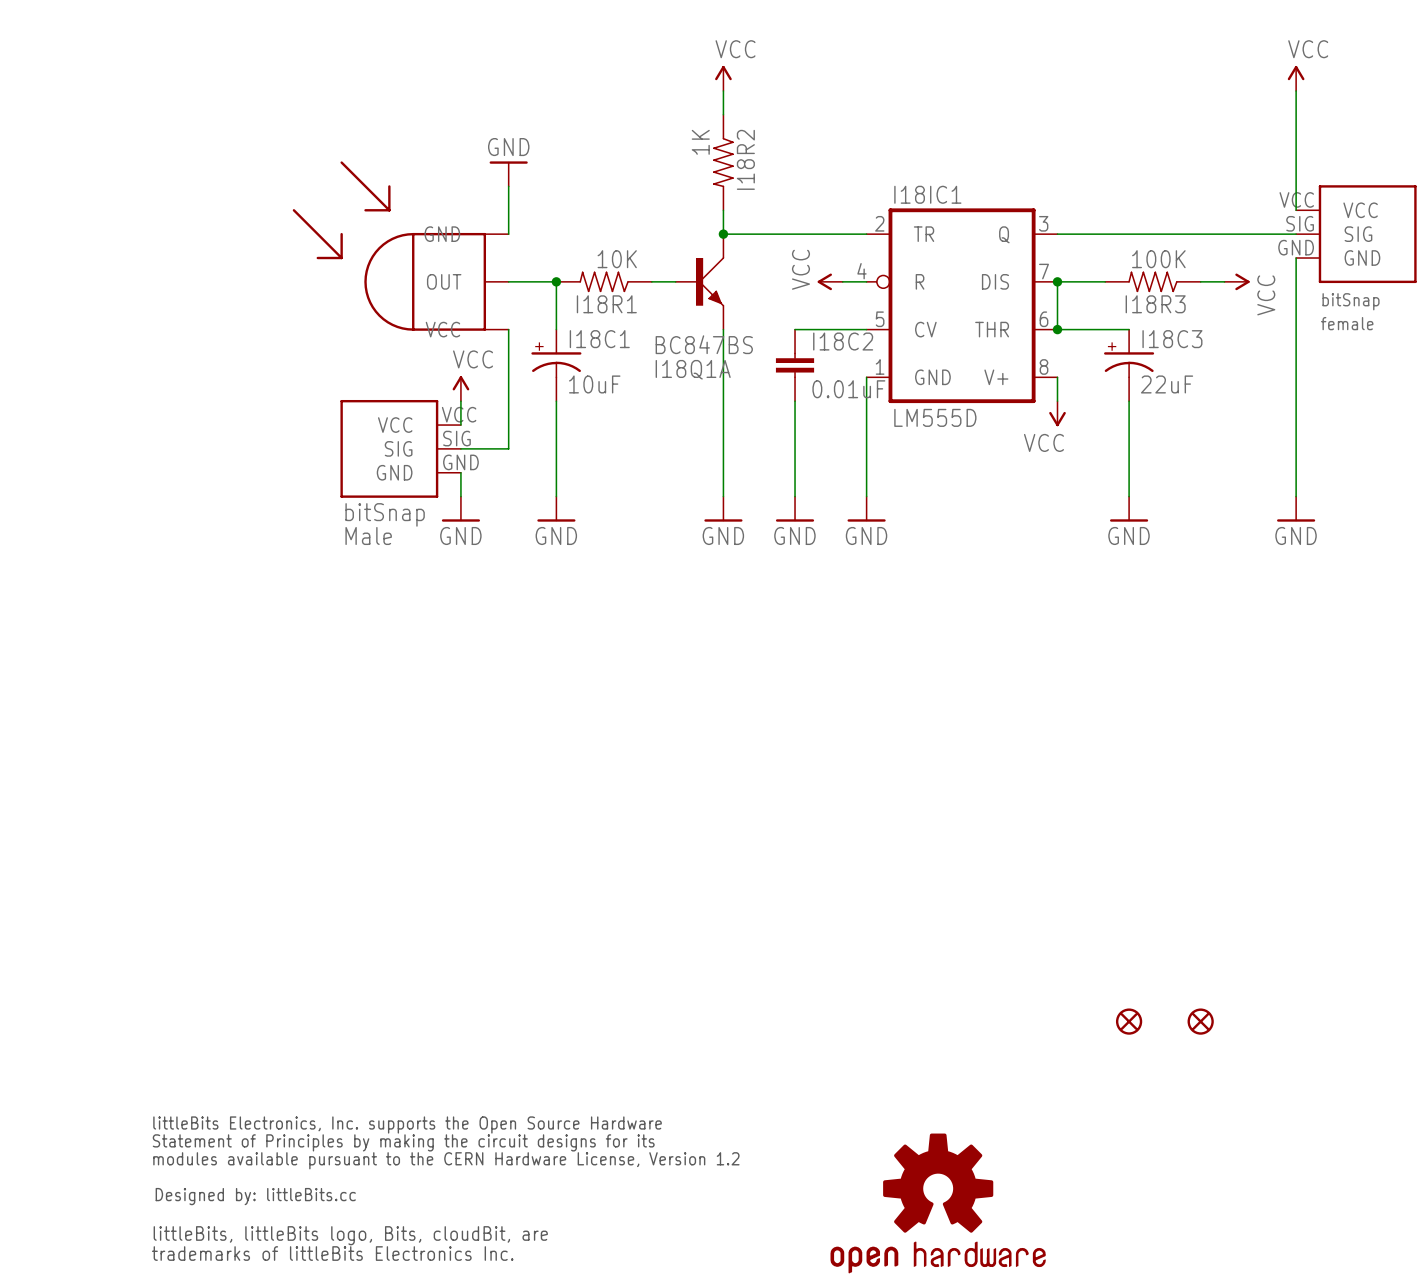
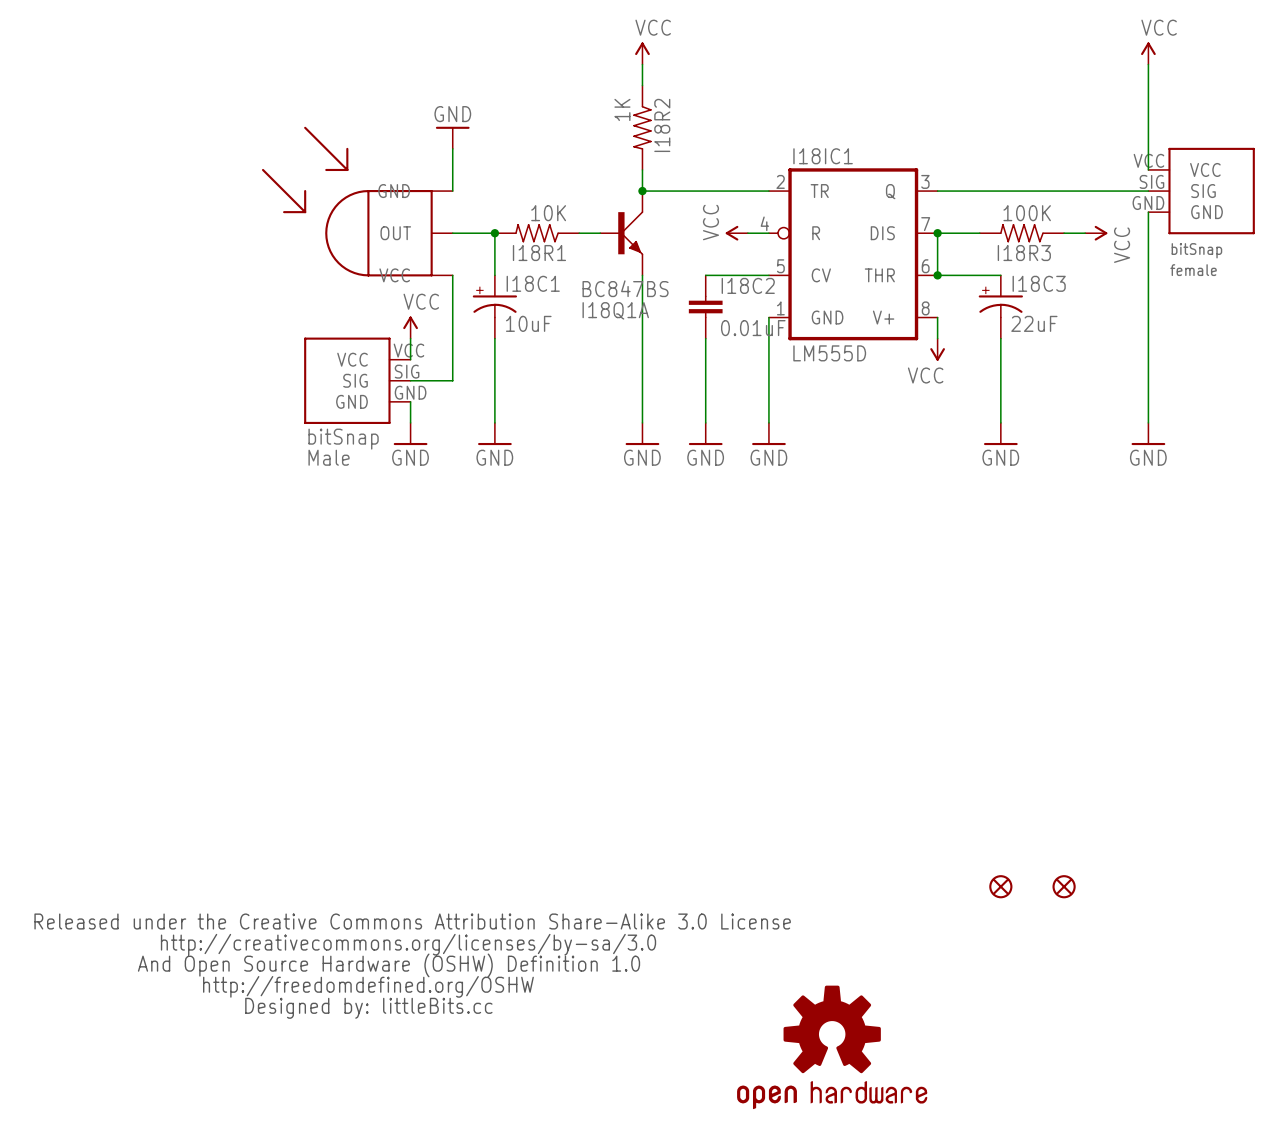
part: none -> (412, 966)
part: (445, 1188) -> none

